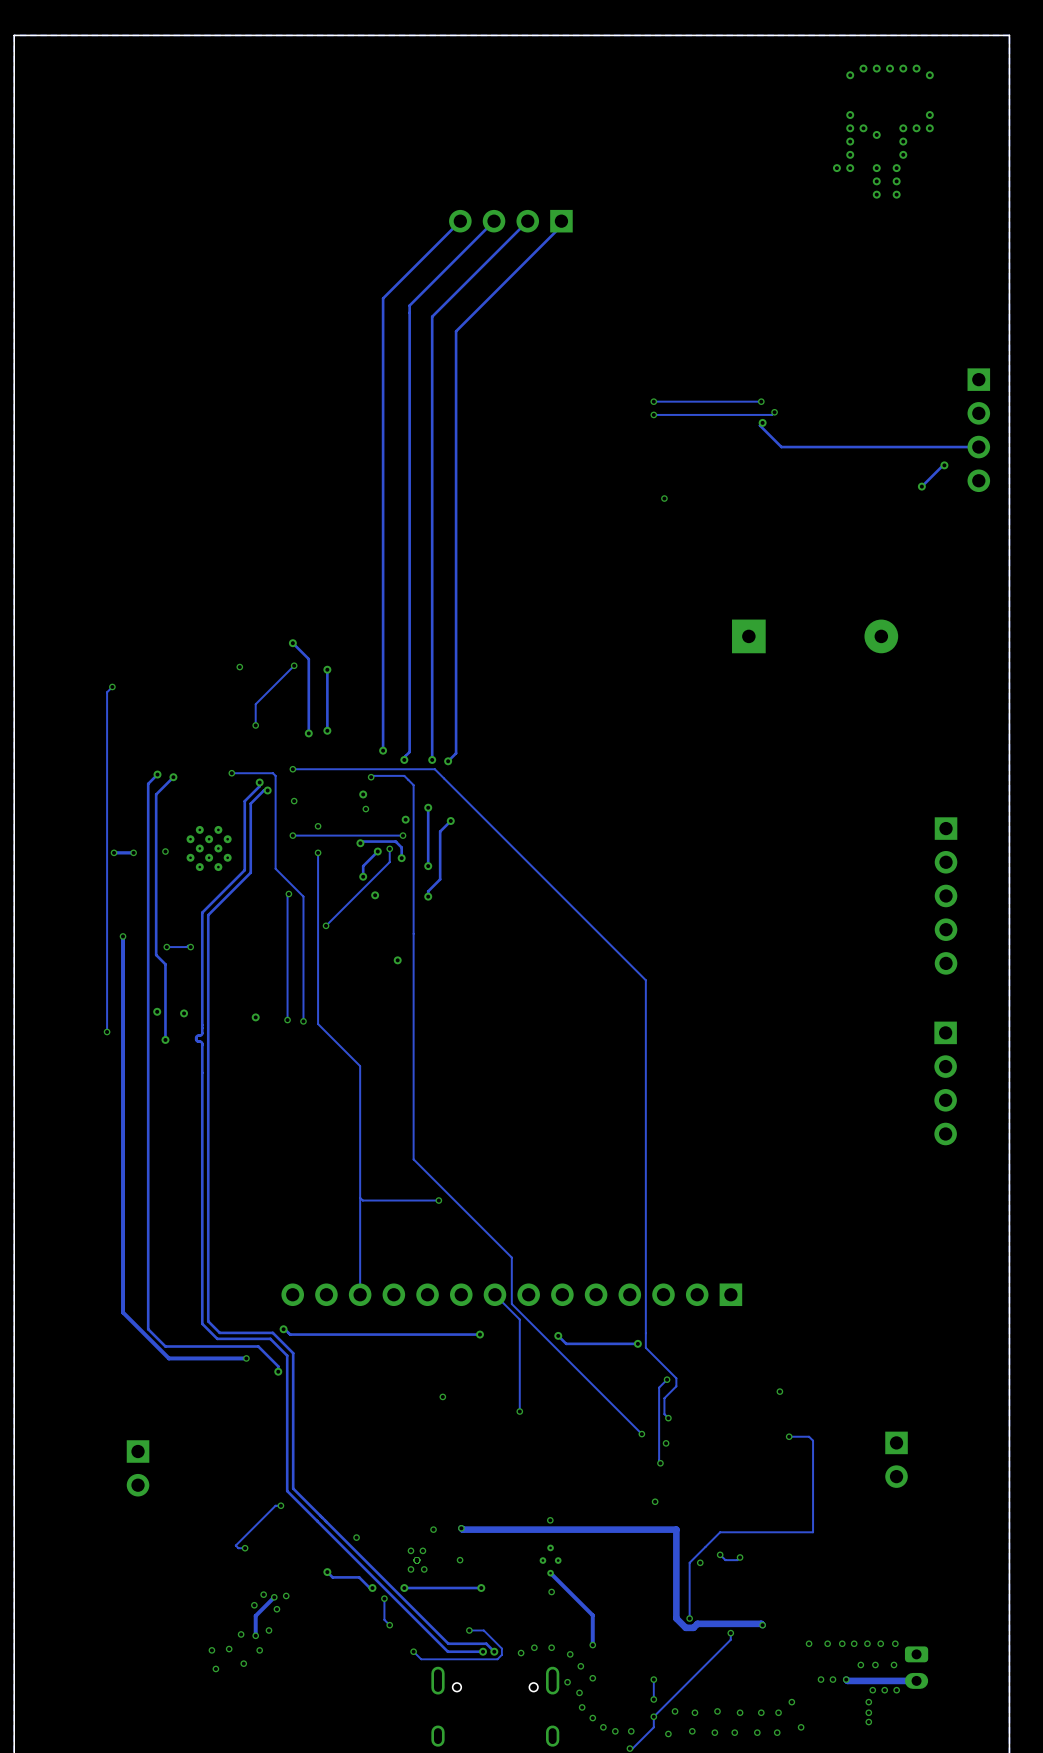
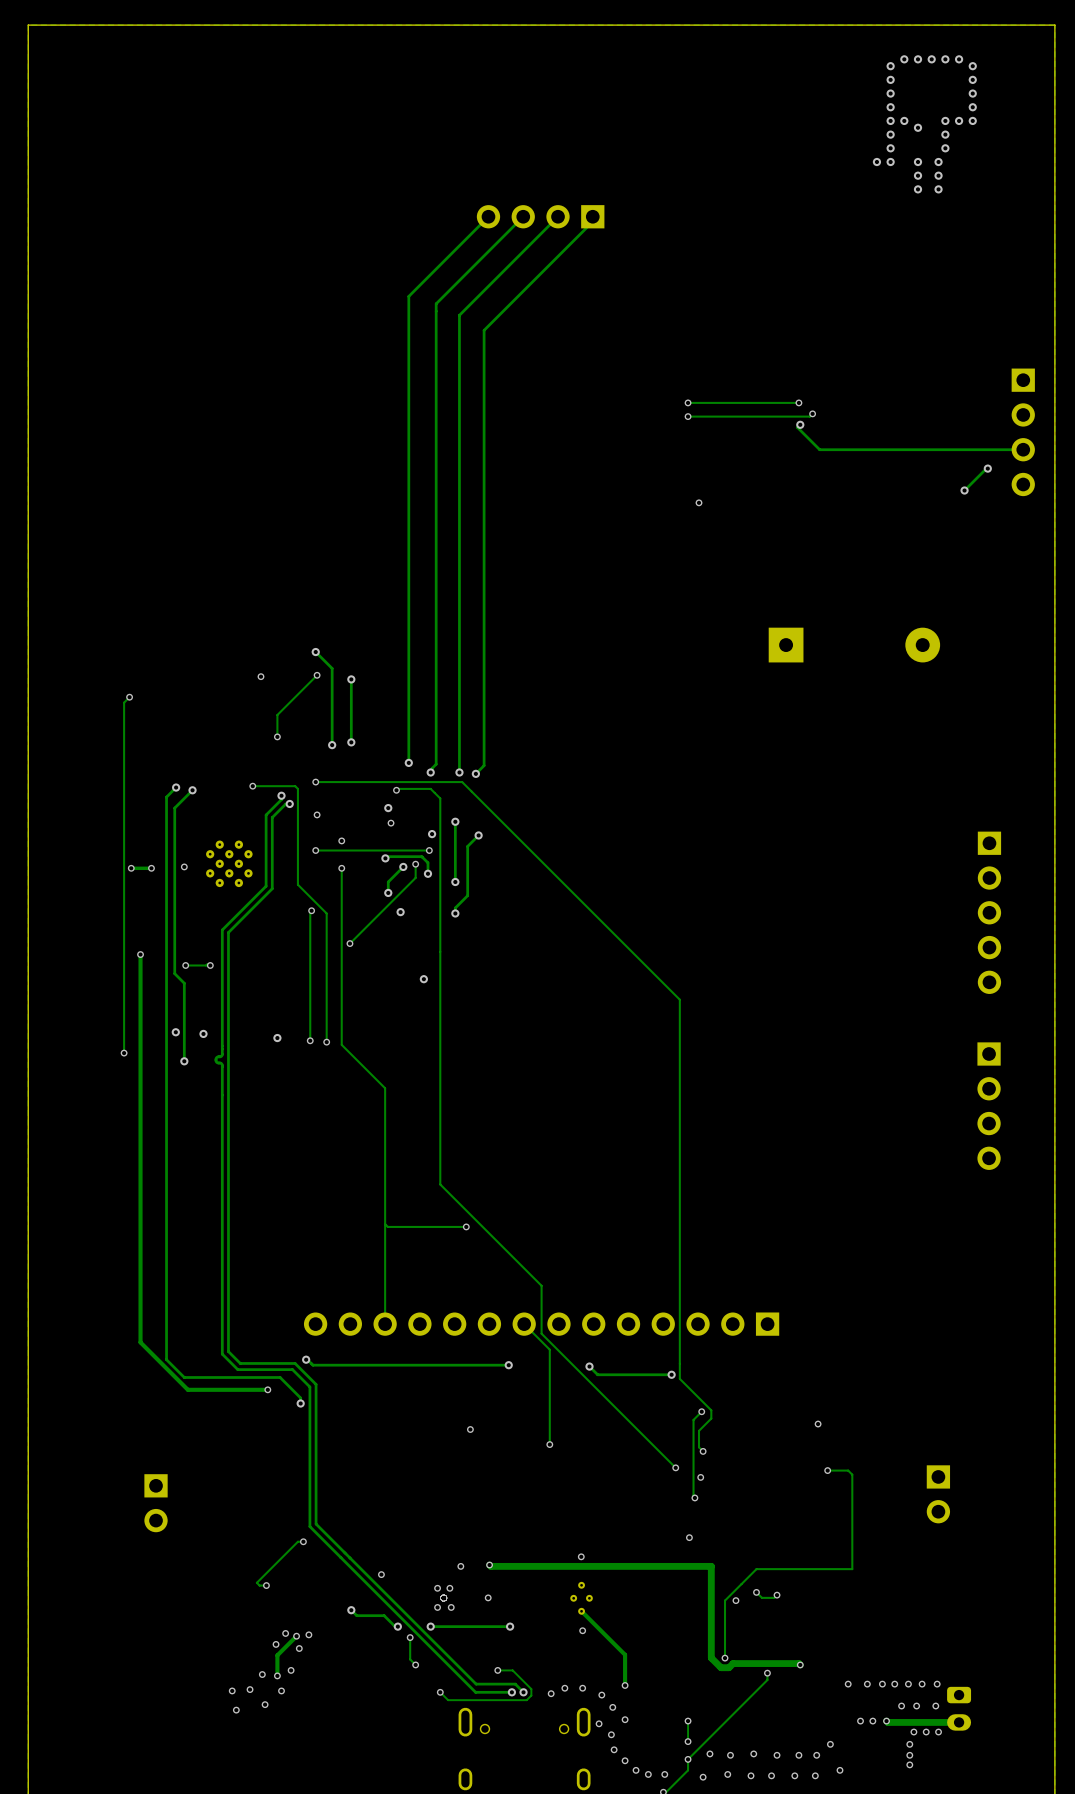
via: none -> (890, 79)
via: none -> (972, 79)
via: none -> (890, 93)
via: none -> (972, 93)

